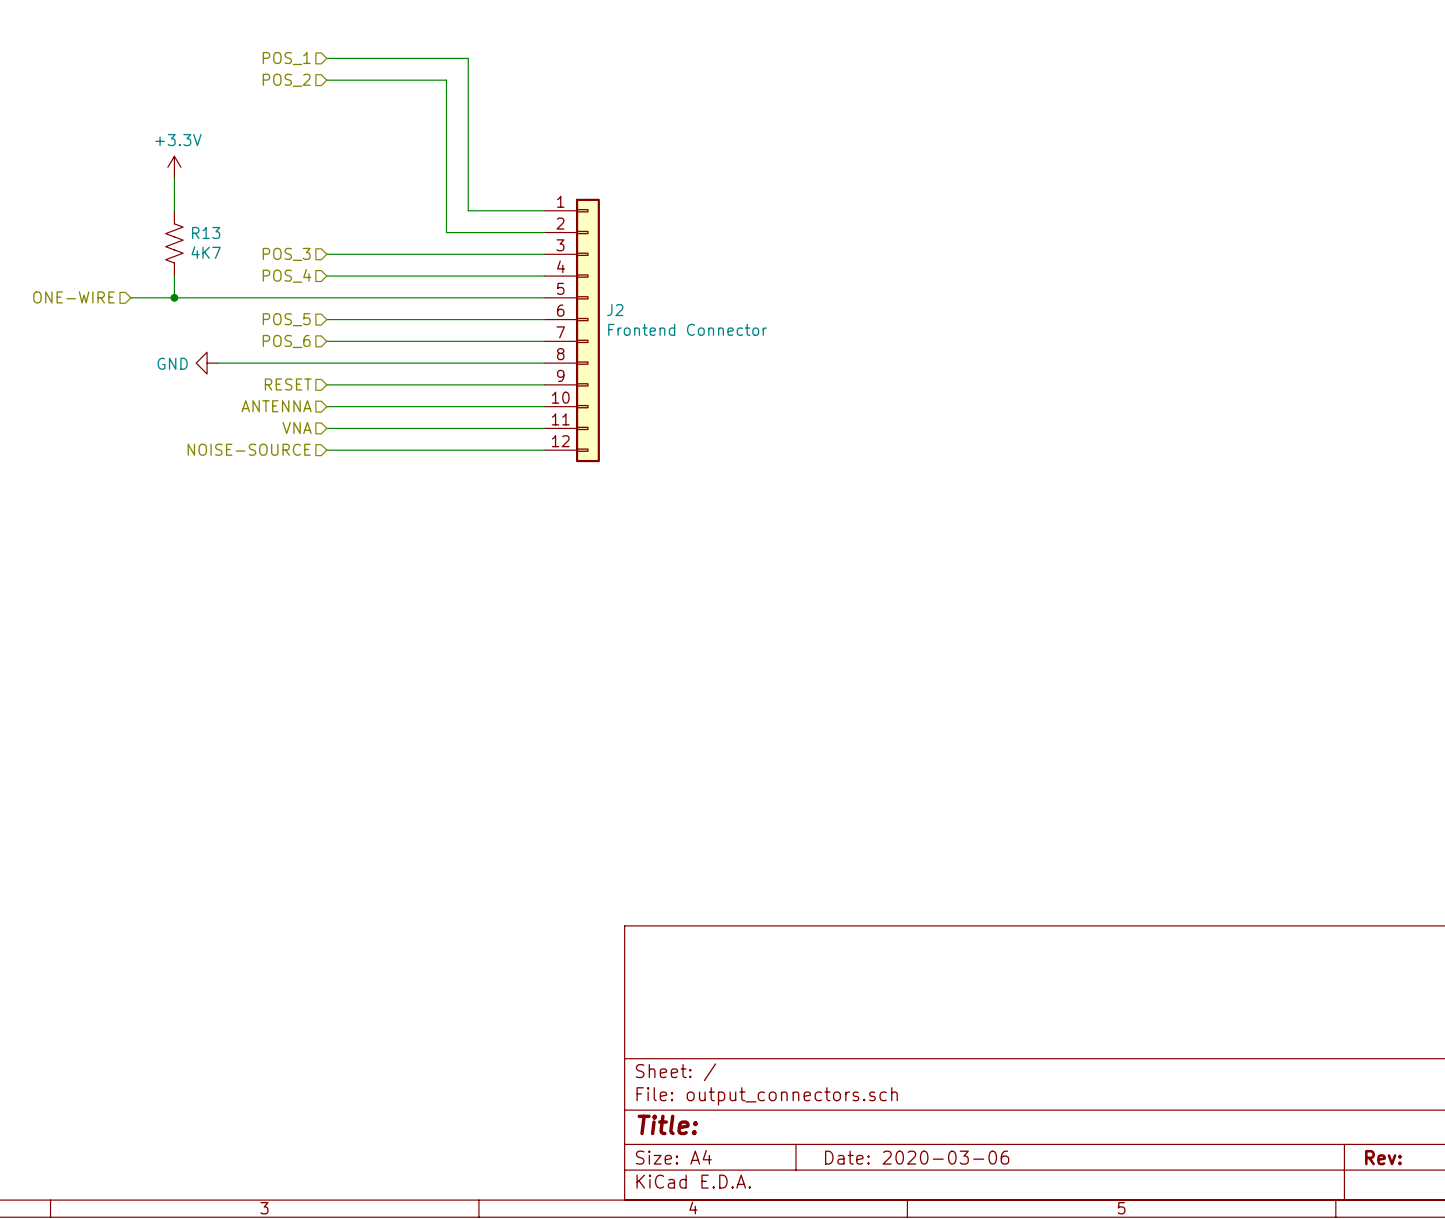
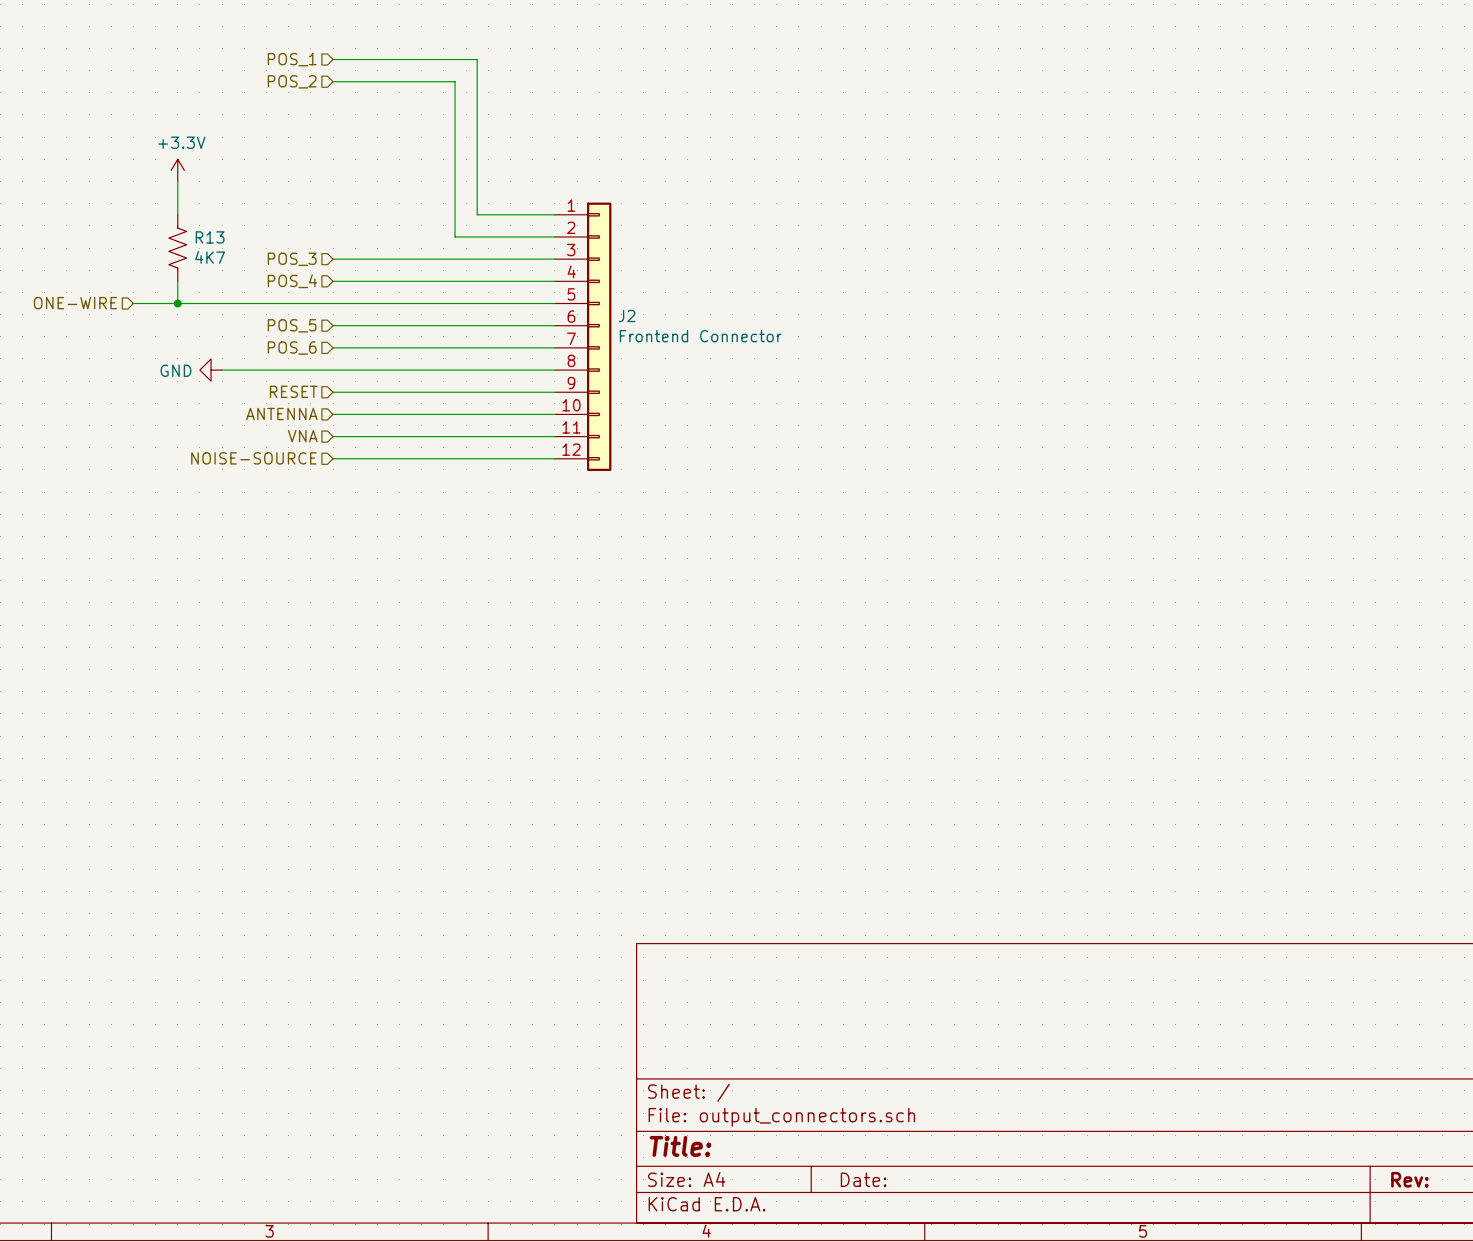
title block: Date: 2020-03-06 (917, 1157) -> Date: (863, 1179)

